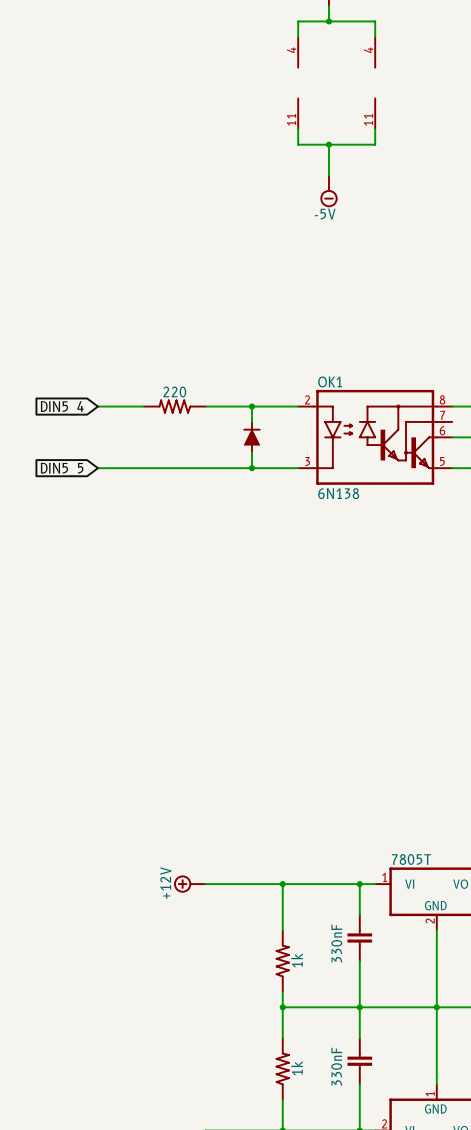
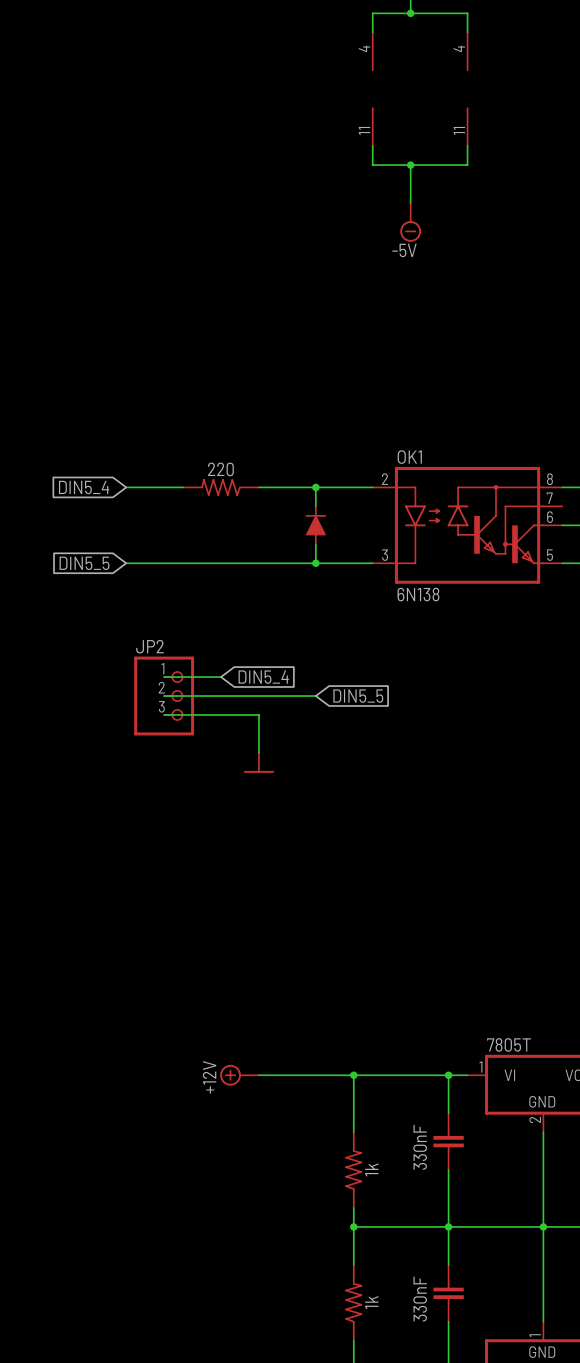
wire: none -> (164, 677) (221, 677)
global label: none -> DIN5_4 (263, 677)
wire: none -> (164, 696) (315, 696)
JP2: none -> (164, 696)
global label: none -> DIN5_5 (358, 696)
wire: none -> (164, 714) (258, 714) (258, 752)
power symbol: none -> (258, 762)

